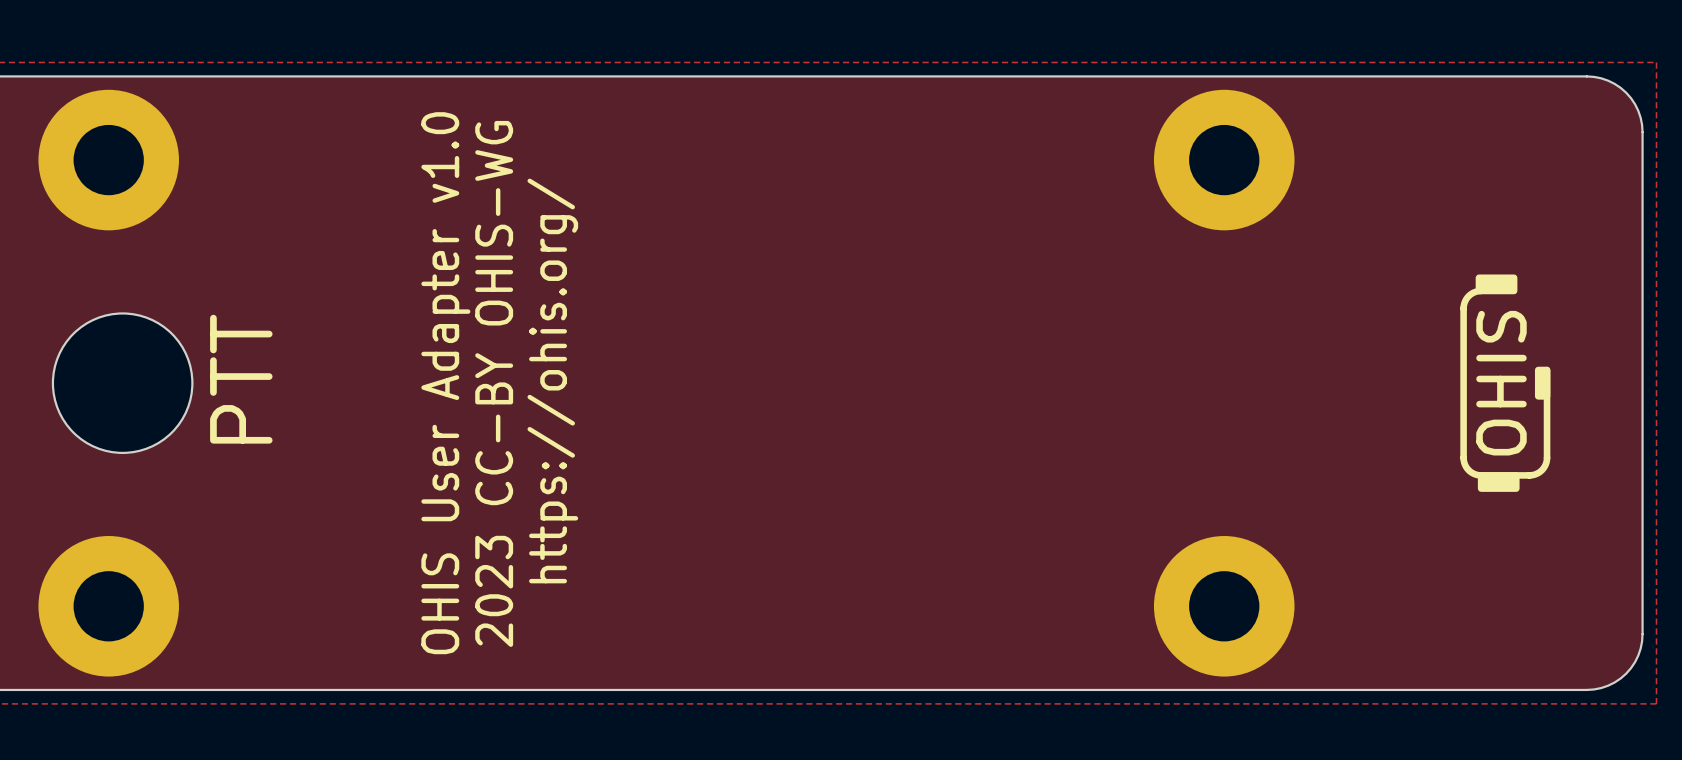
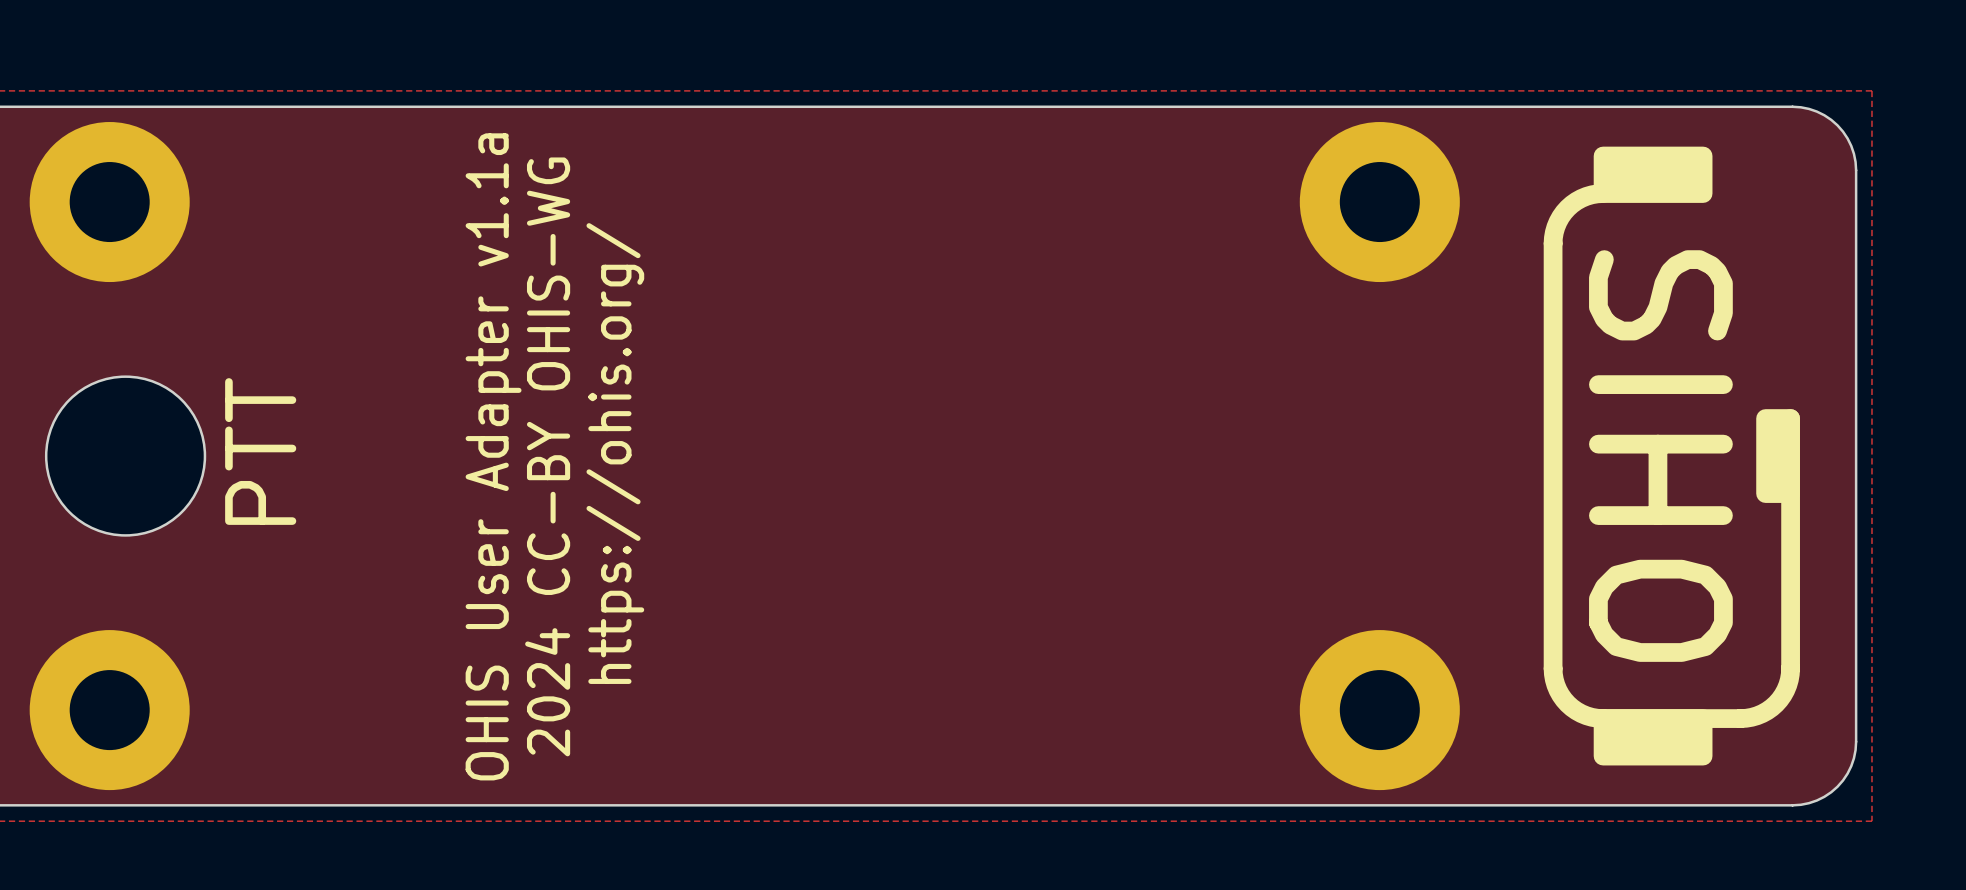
drawing: none -> [1543, 146, 1800, 766]
drawing: [1460, 274, 1551, 492] -> none
text: OHIS User Adapter v1.0 (445, 383) -> OHIS User Adapter v1.1a (493, 456)
text: 2023 CC-BY OHIS-WG (494, 383) -> 2024 CC-BY OHIS-WG (547, 456)

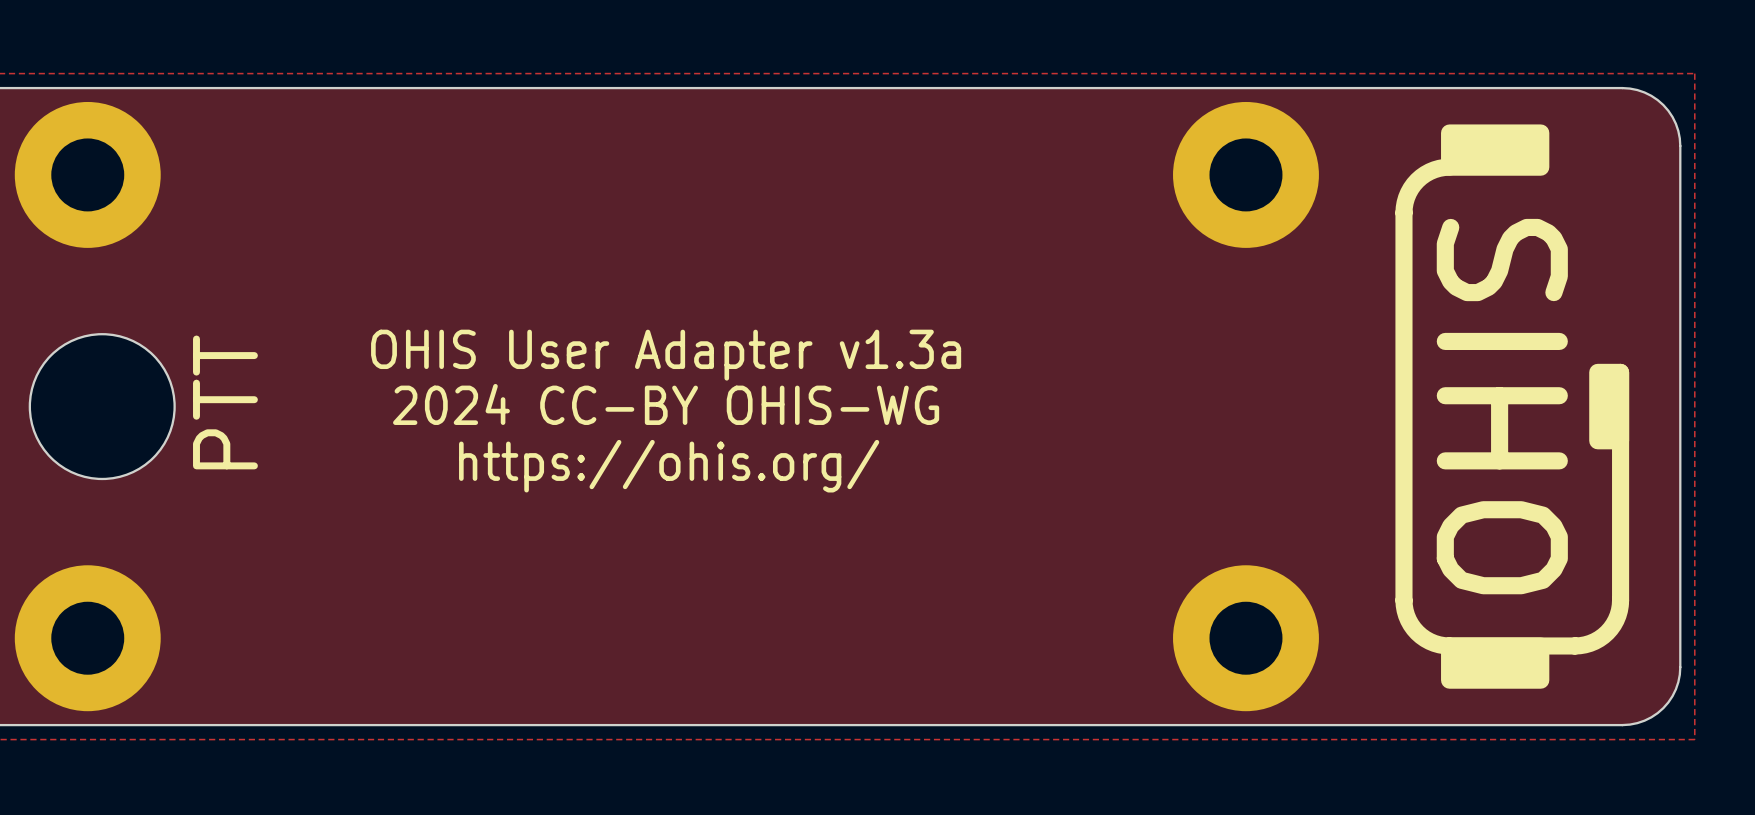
text rotation: 0° (615, 453) -> 90° clockwise (669, 466)
text: OHIS User Adapter v1.1a (493, 456) -> OHIS User Adapter v1.3a (666, 355)
text rotation: 0° (547, 456) -> 90° clockwise (666, 404)

